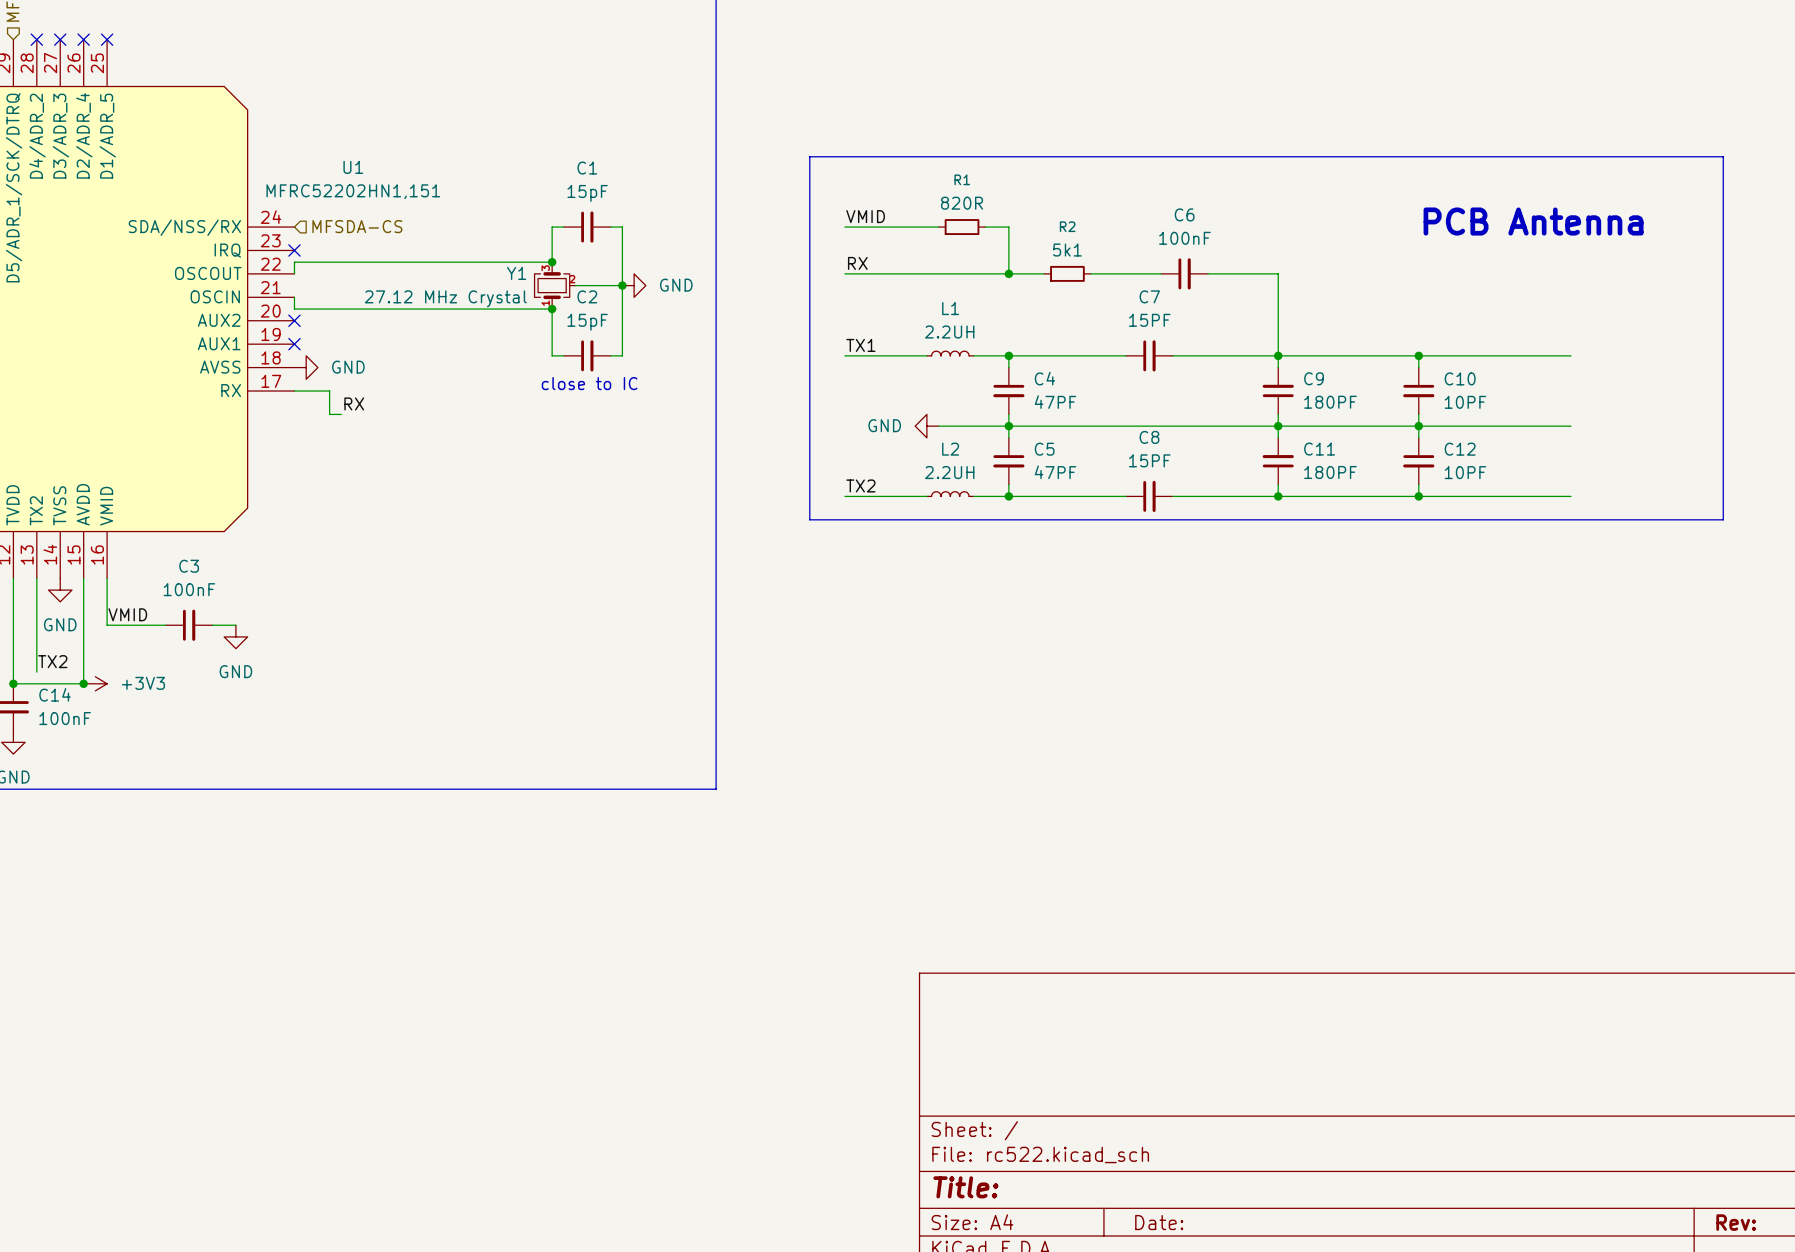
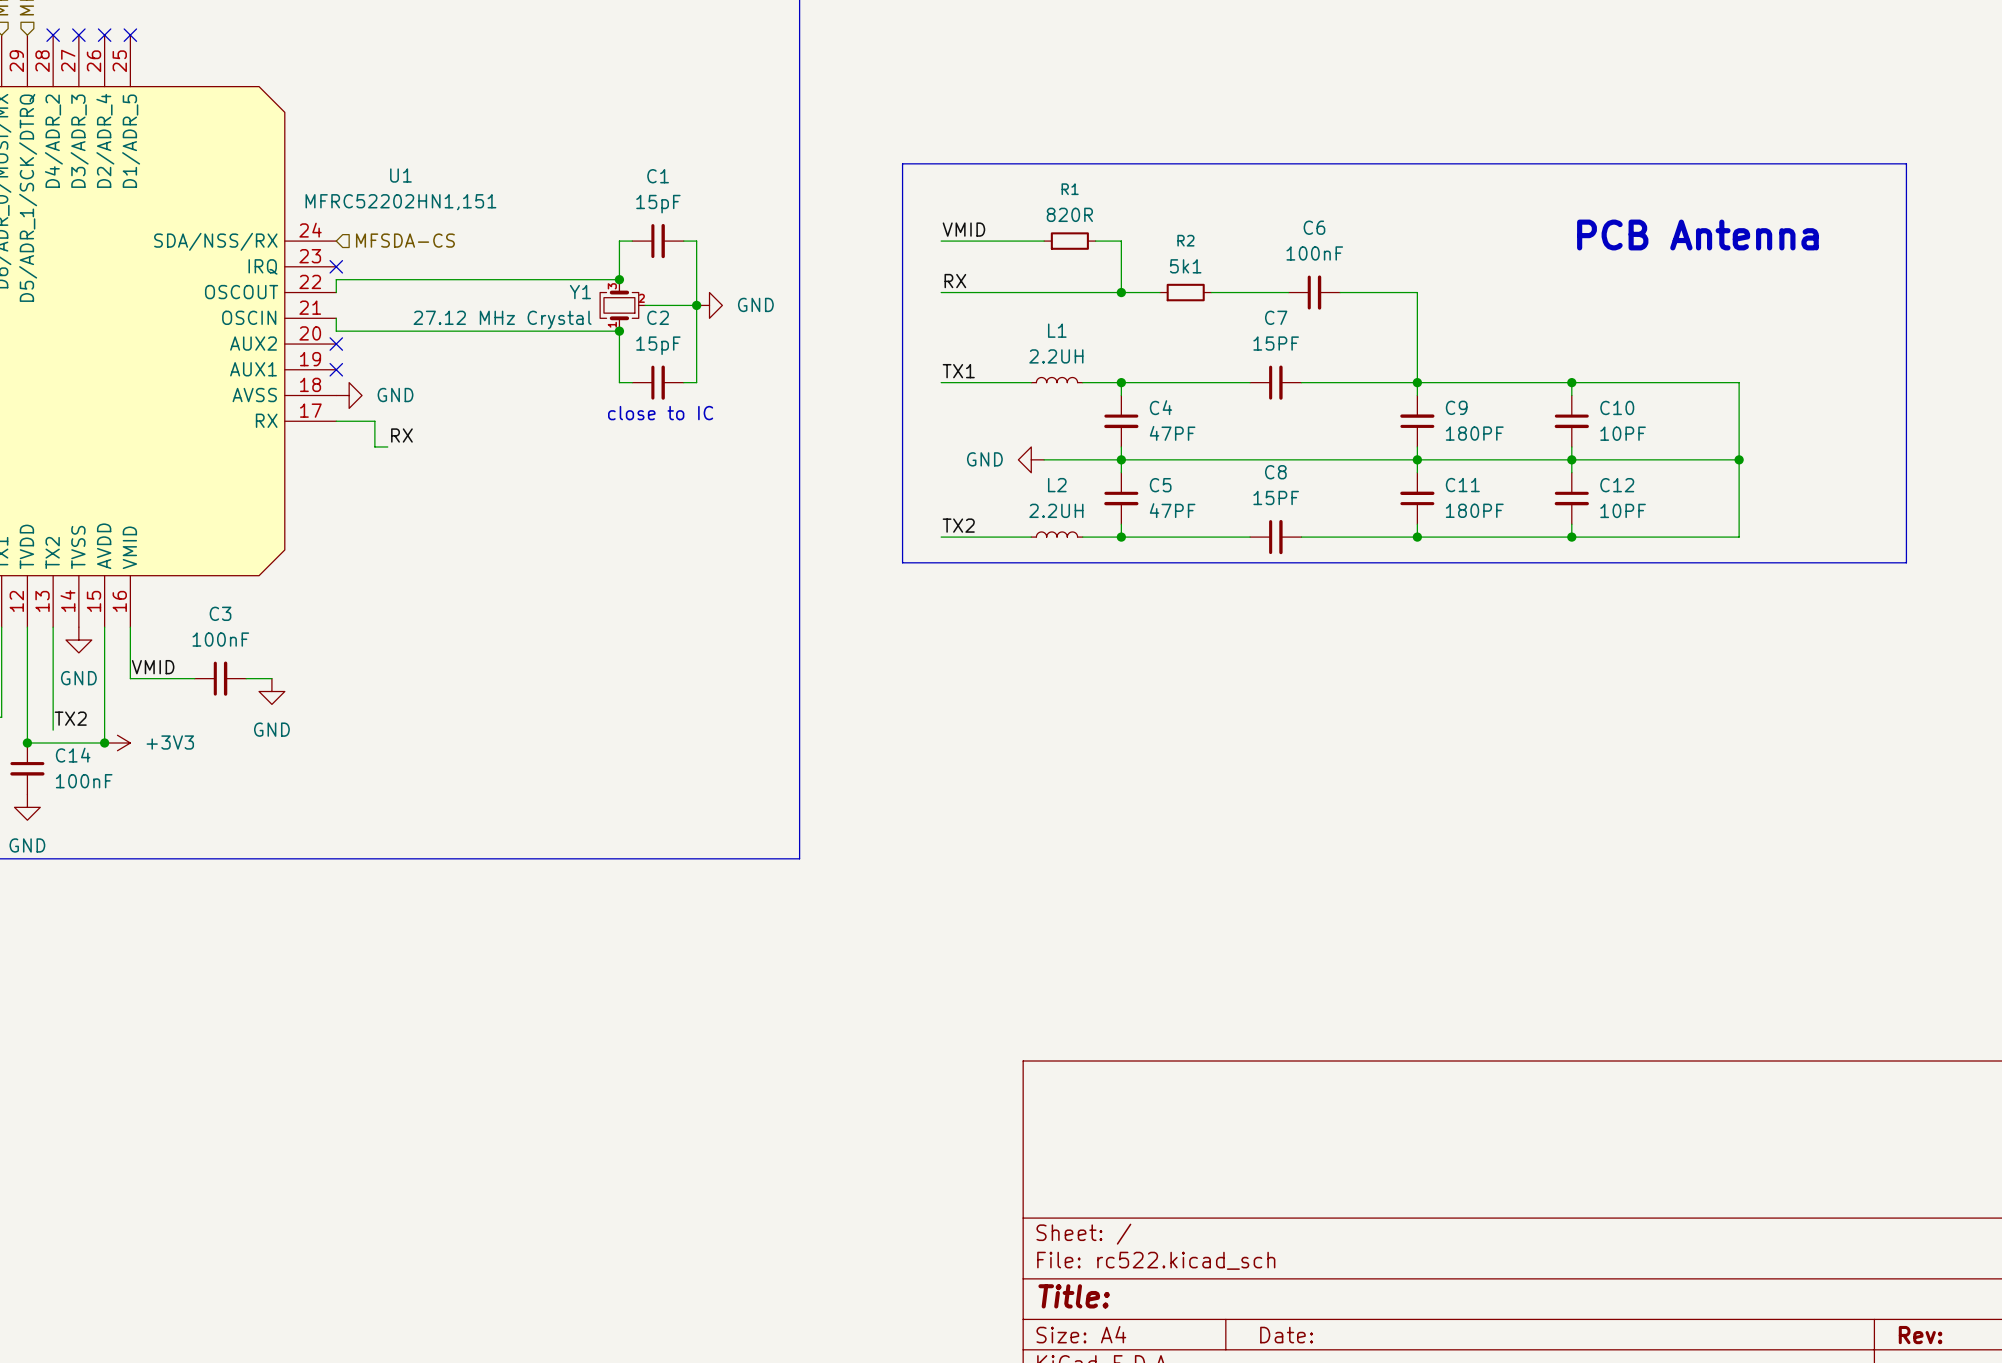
wire: none -> (1739, 382) (1739, 537)
junction: none -> (1739, 459)

